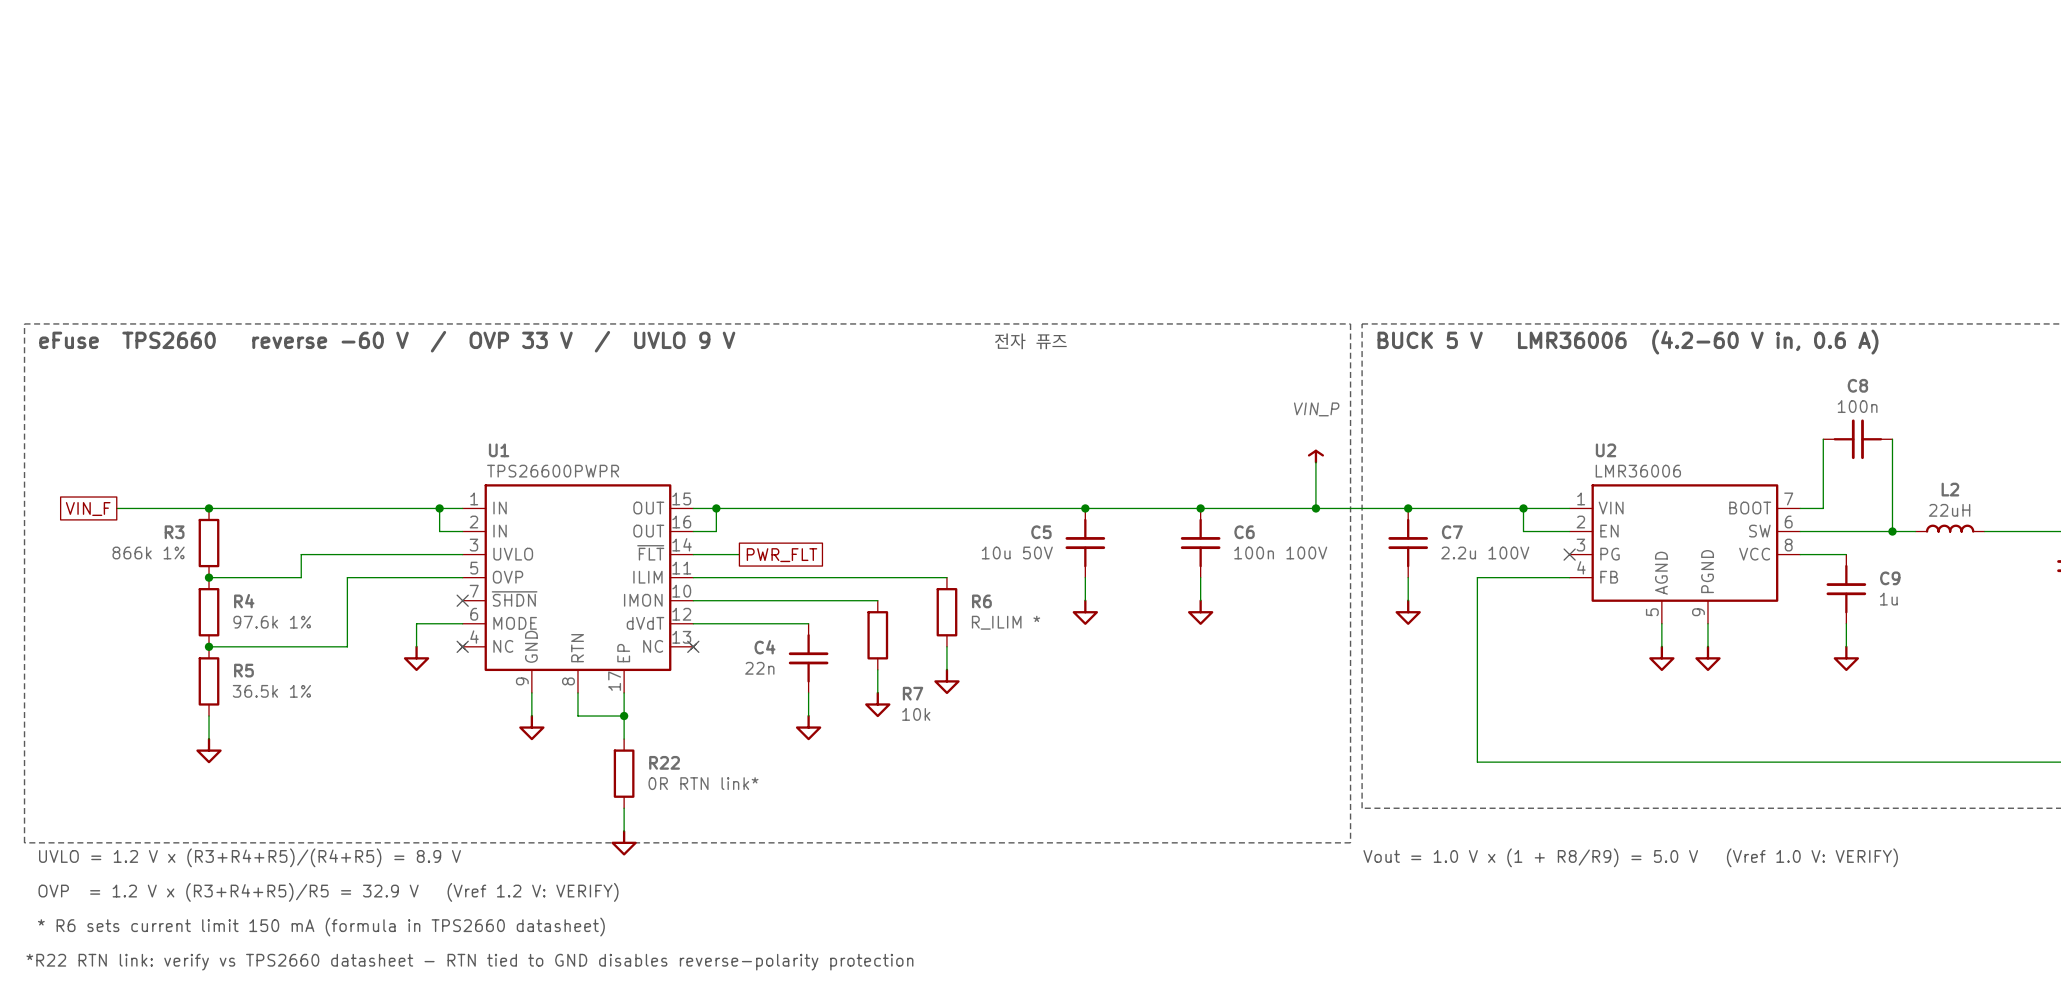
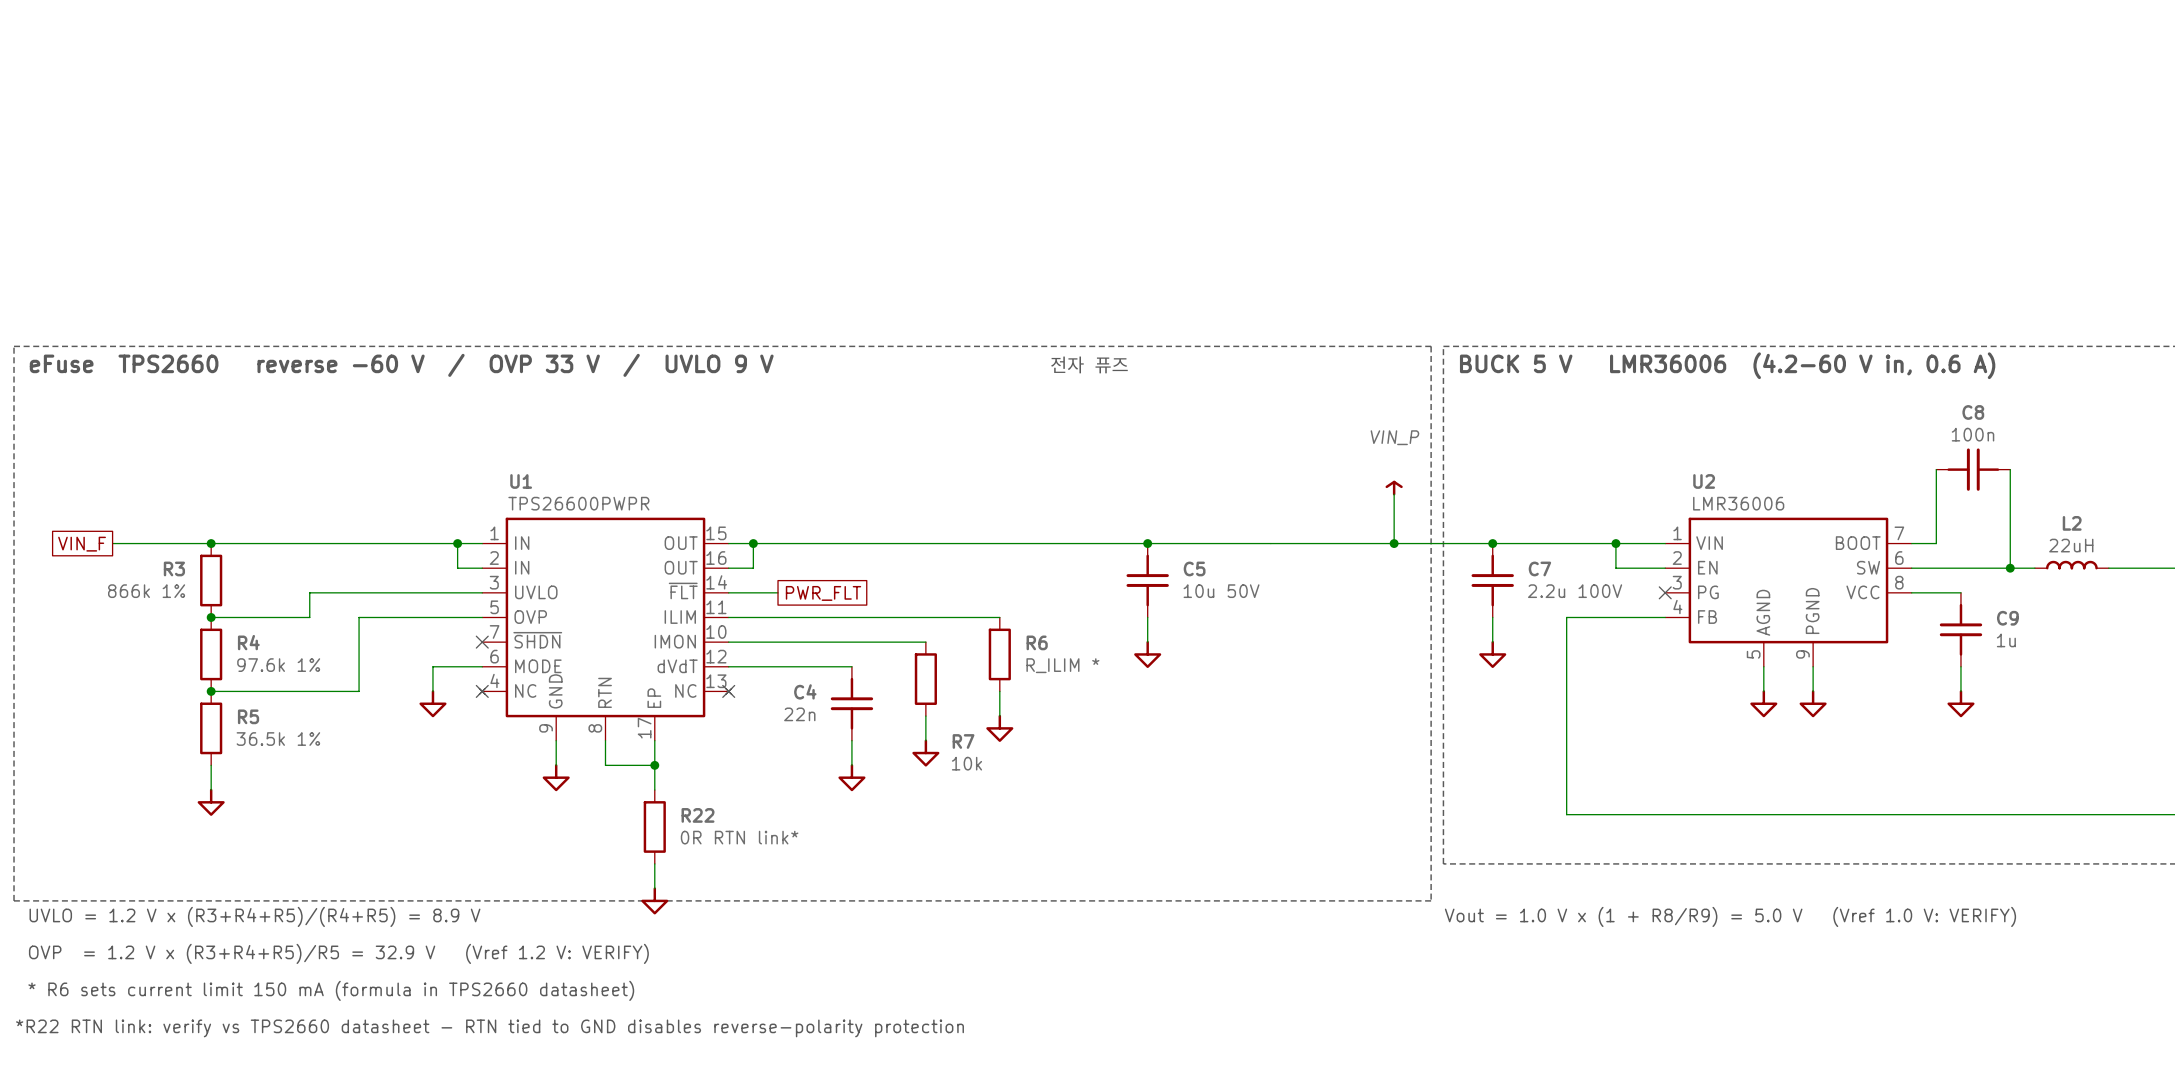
junction: (1200, 508) -> none
C5 name position: C5 (1041, 532) -> C5 (1194, 568)
C6: 100n 100V (1200, 543) -> none
C5 value position: 10u 50V (1017, 552) -> 10u 50V (1221, 591)
wire: (1200, 577) (1200, 600) -> none
power symbol: (1200, 612) -> none

